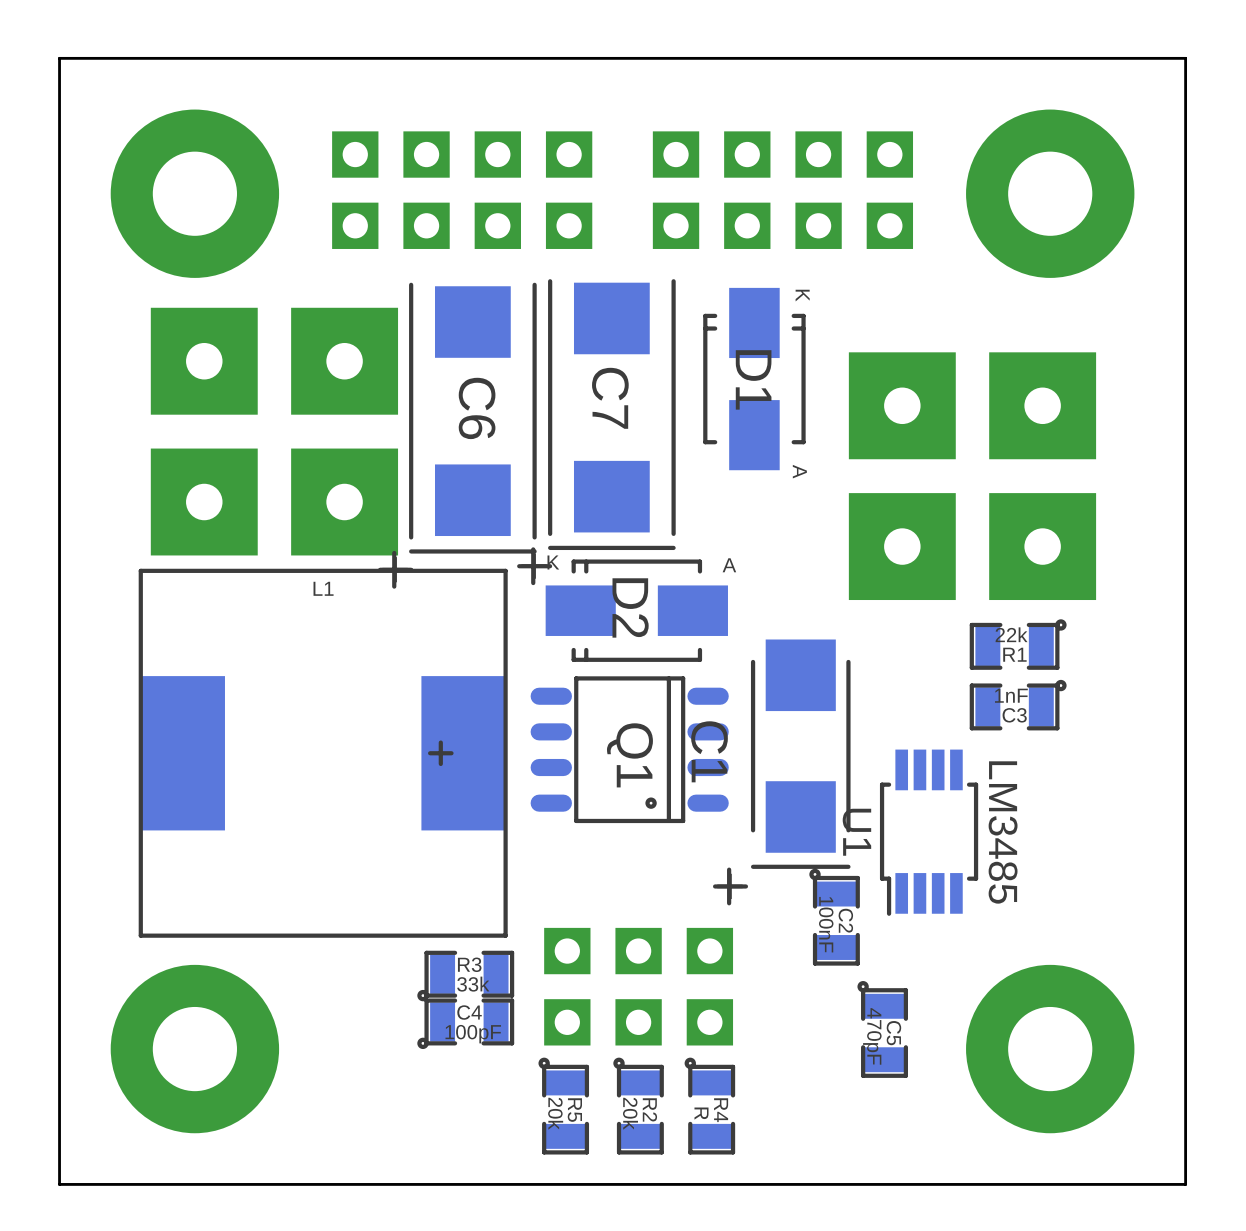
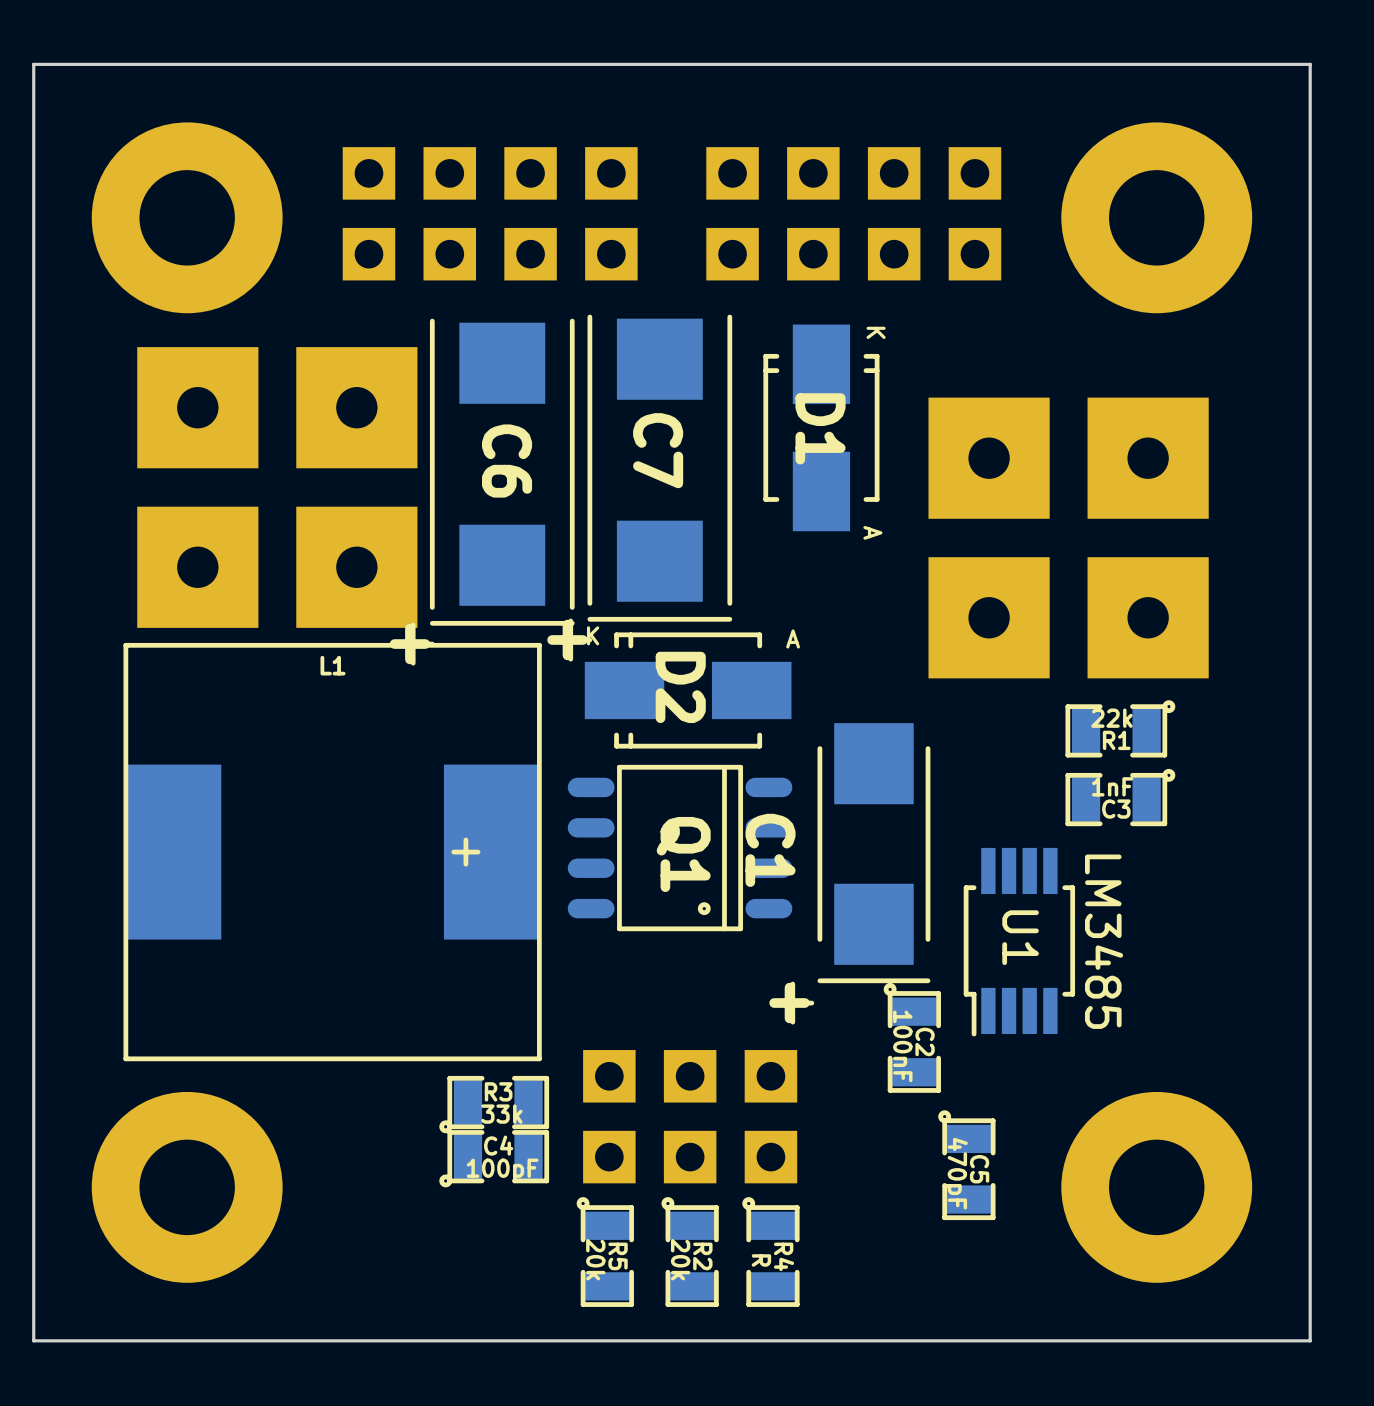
U1 name position: U1 (856, 832) -> U1 (1020, 937)

